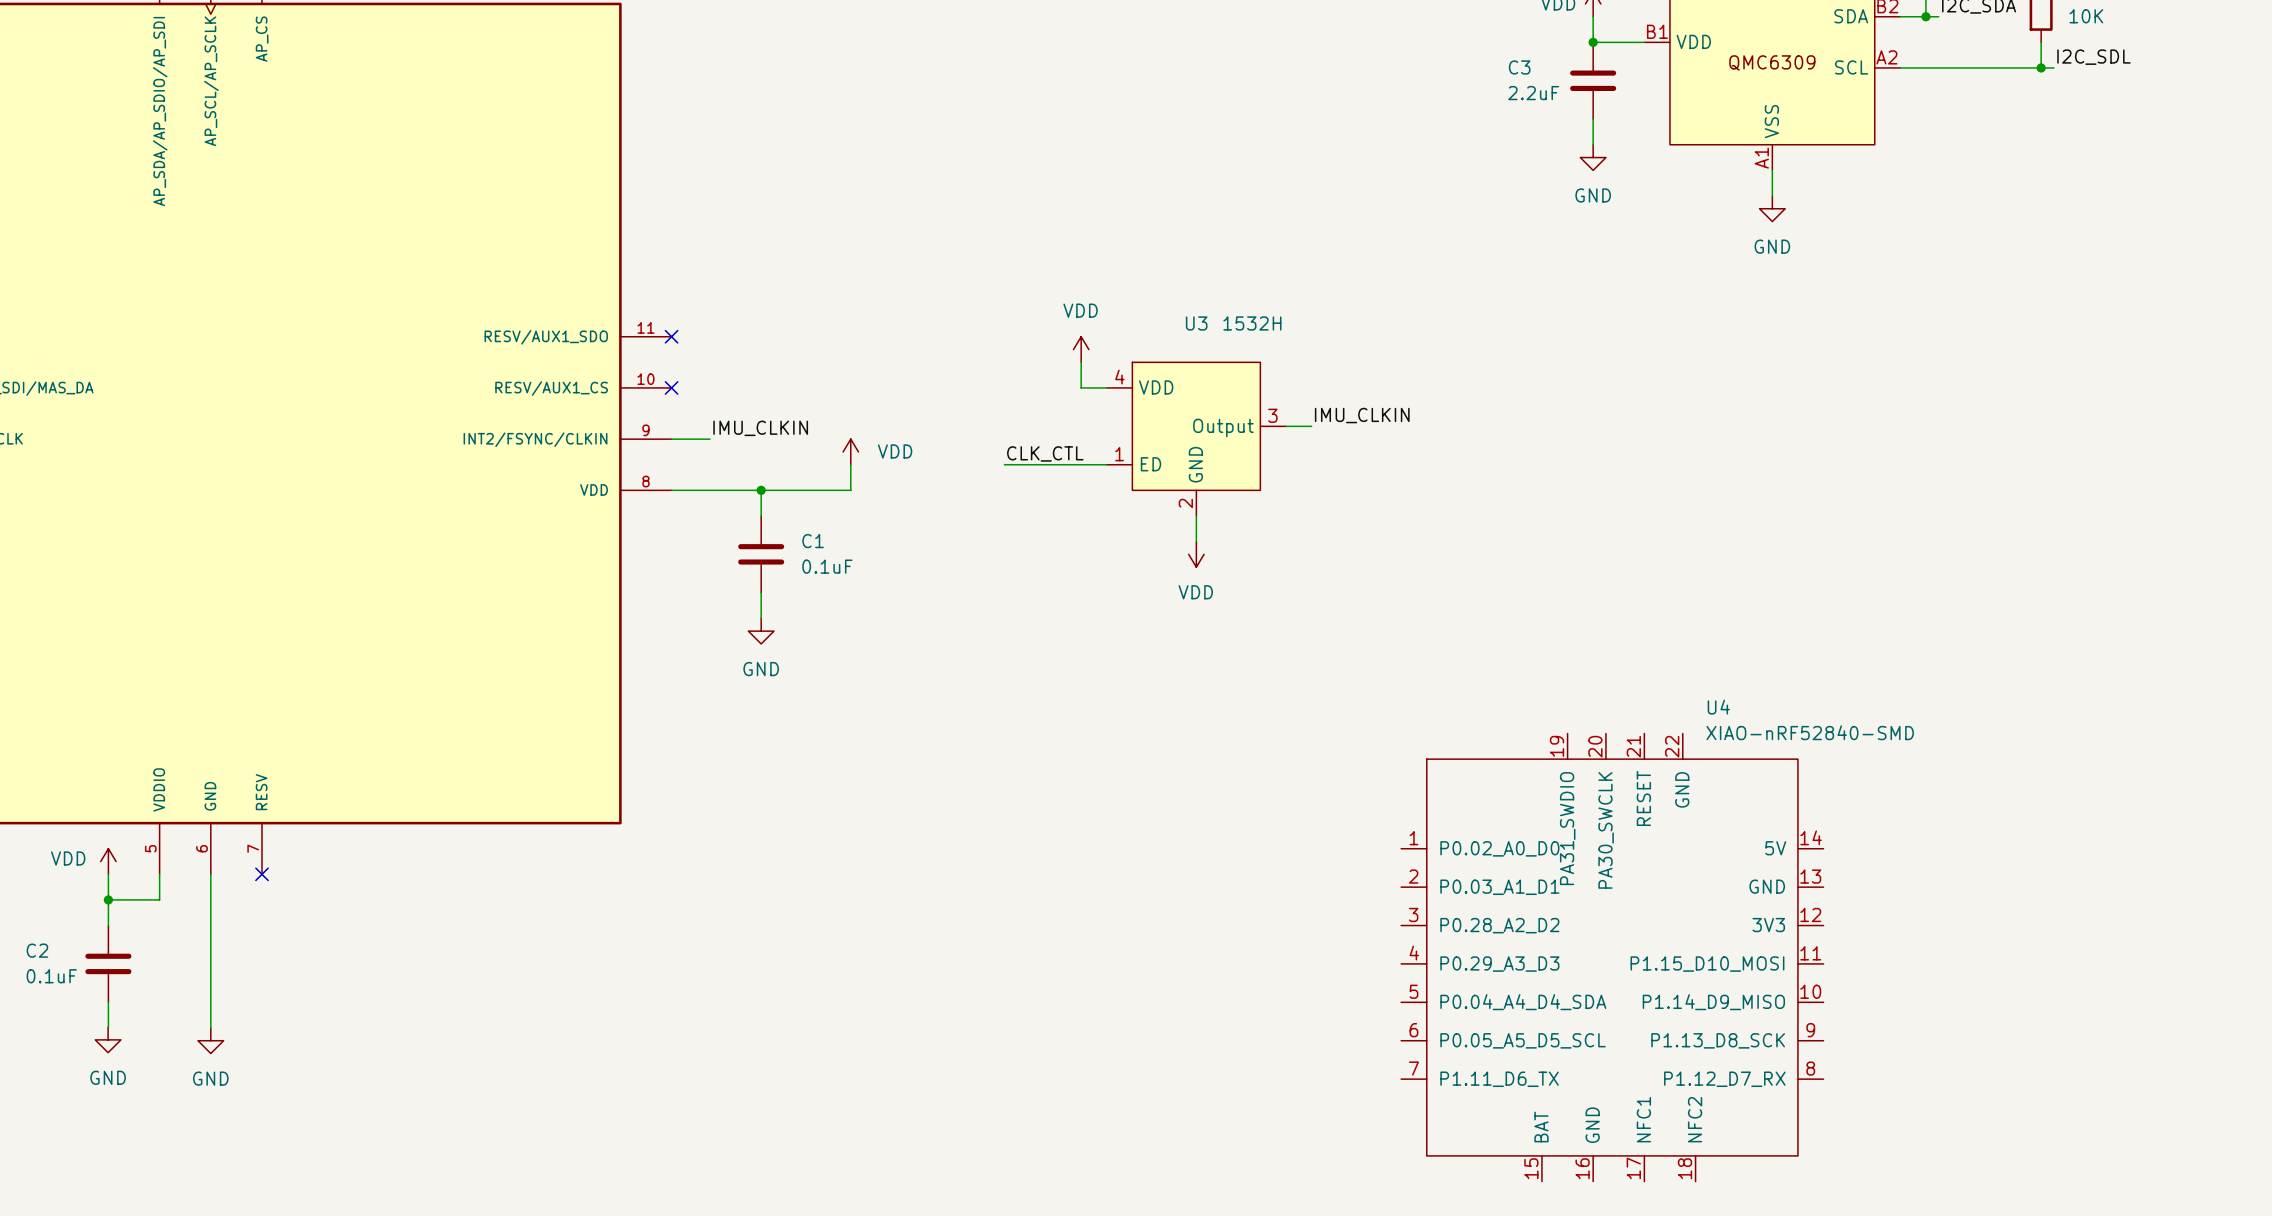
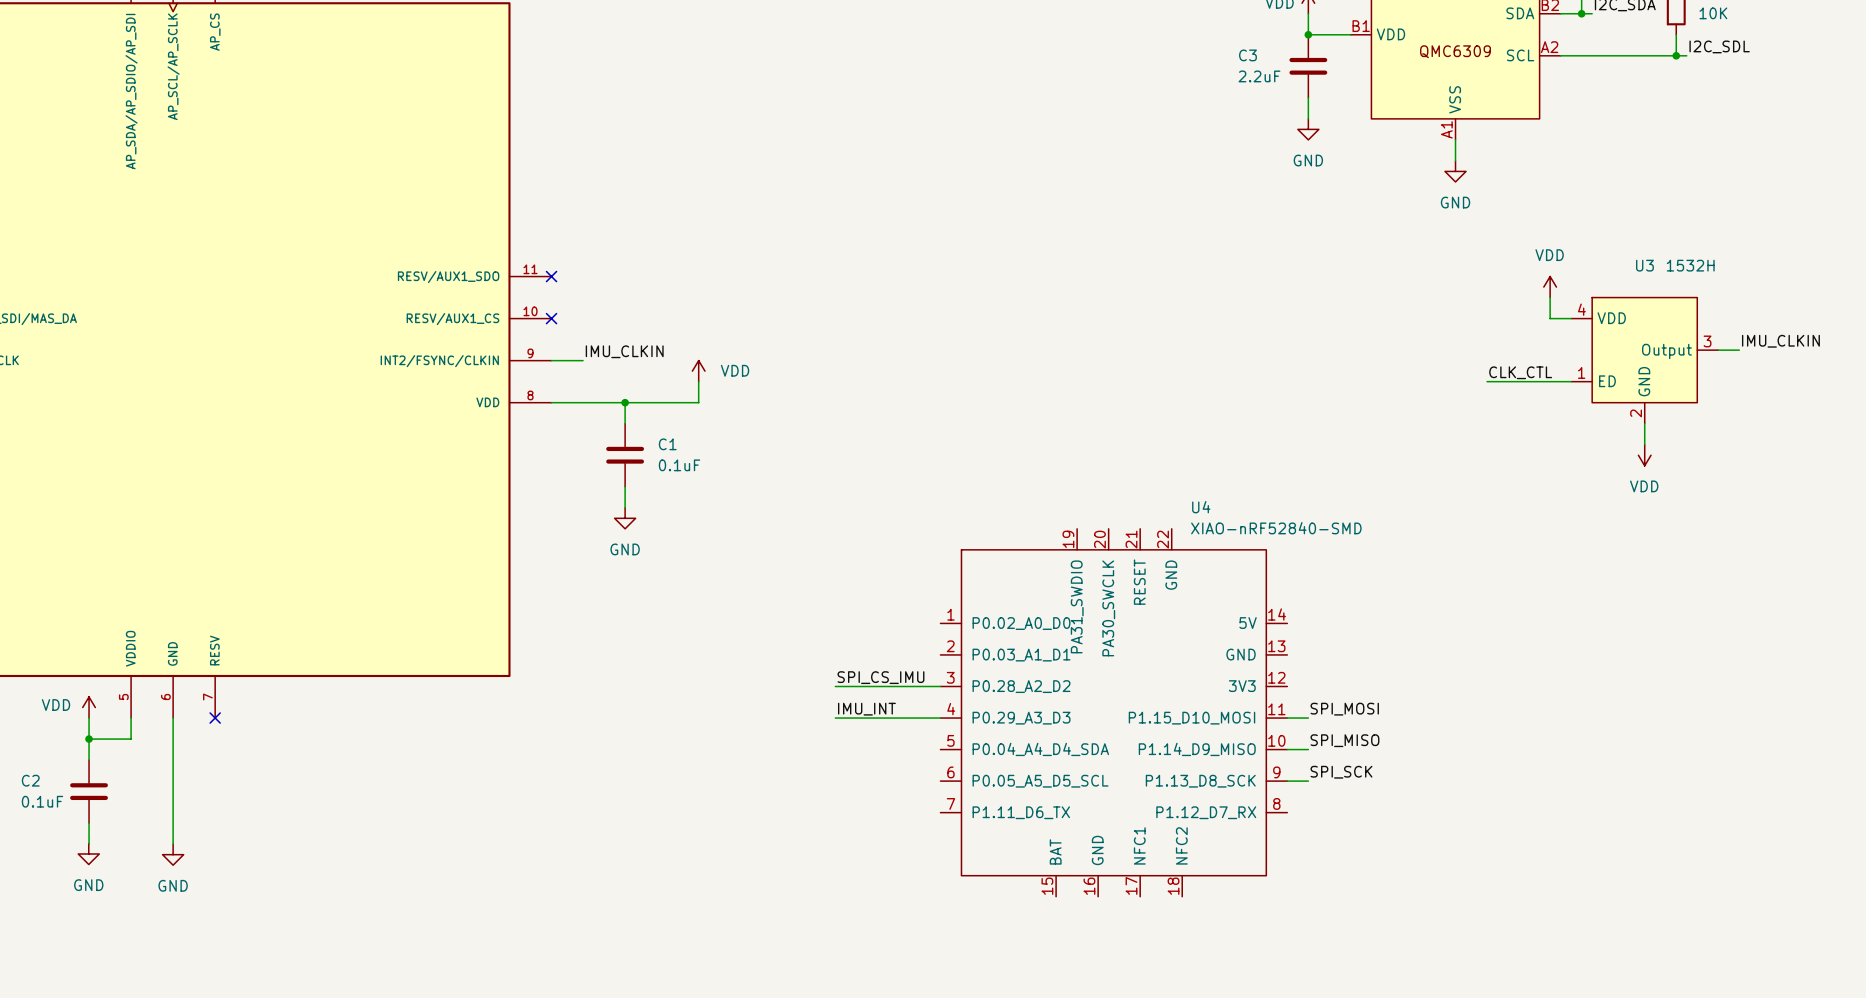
power symbol: VDD (1081, 349) -> none
power symbol: none -> VDD (1550, 287)
wire: (1081, 362) (1081, 387) (1106, 387) -> none
wire: none -> (1550, 297) (1550, 318) (1571, 318)
label: IMU_CLKIN (1362, 415) -> none
label: none -> IMU_CLKIN (1780, 341)
wire: (1285, 426) (1311, 426) -> none
wire: none -> (1718, 350) (1739, 350)
U3 position: (1196, 439) -> (1644, 360)
label: CLK_CTL (1045, 453) -> none
label: none -> CLK_CTL (1520, 372)
wire: (1004, 464) (1106, 464) -> none
wire: none -> (1487, 381) (1571, 381)
wire: (1196, 515) (1196, 541) -> none
wire: none -> (1644, 423) (1644, 444)
power symbol: VDD (1196, 554) -> none
power symbol: none -> VDD (1644, 455)
label: none -> SPI_CS_IMU (880, 677)
wire: none -> (835, 686) (940, 686)
label: none -> IMU_INT (866, 709)
label: none -> SPI_MOSI (1344, 709)
wire: none -> (835, 718) (940, 718)
wire: none -> (1287, 718) (1308, 718)
label: none -> SPI_MISO (1344, 740)
wire: none -> (1287, 749) (1308, 749)
label: none -> SPI_SCK (1341, 772)
wire: none -> (1287, 781) (1308, 781)
U4 position: (1612, 957) -> (1113, 712)

